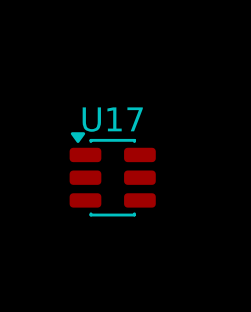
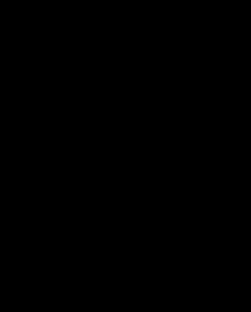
U17: (112, 174) -> none

